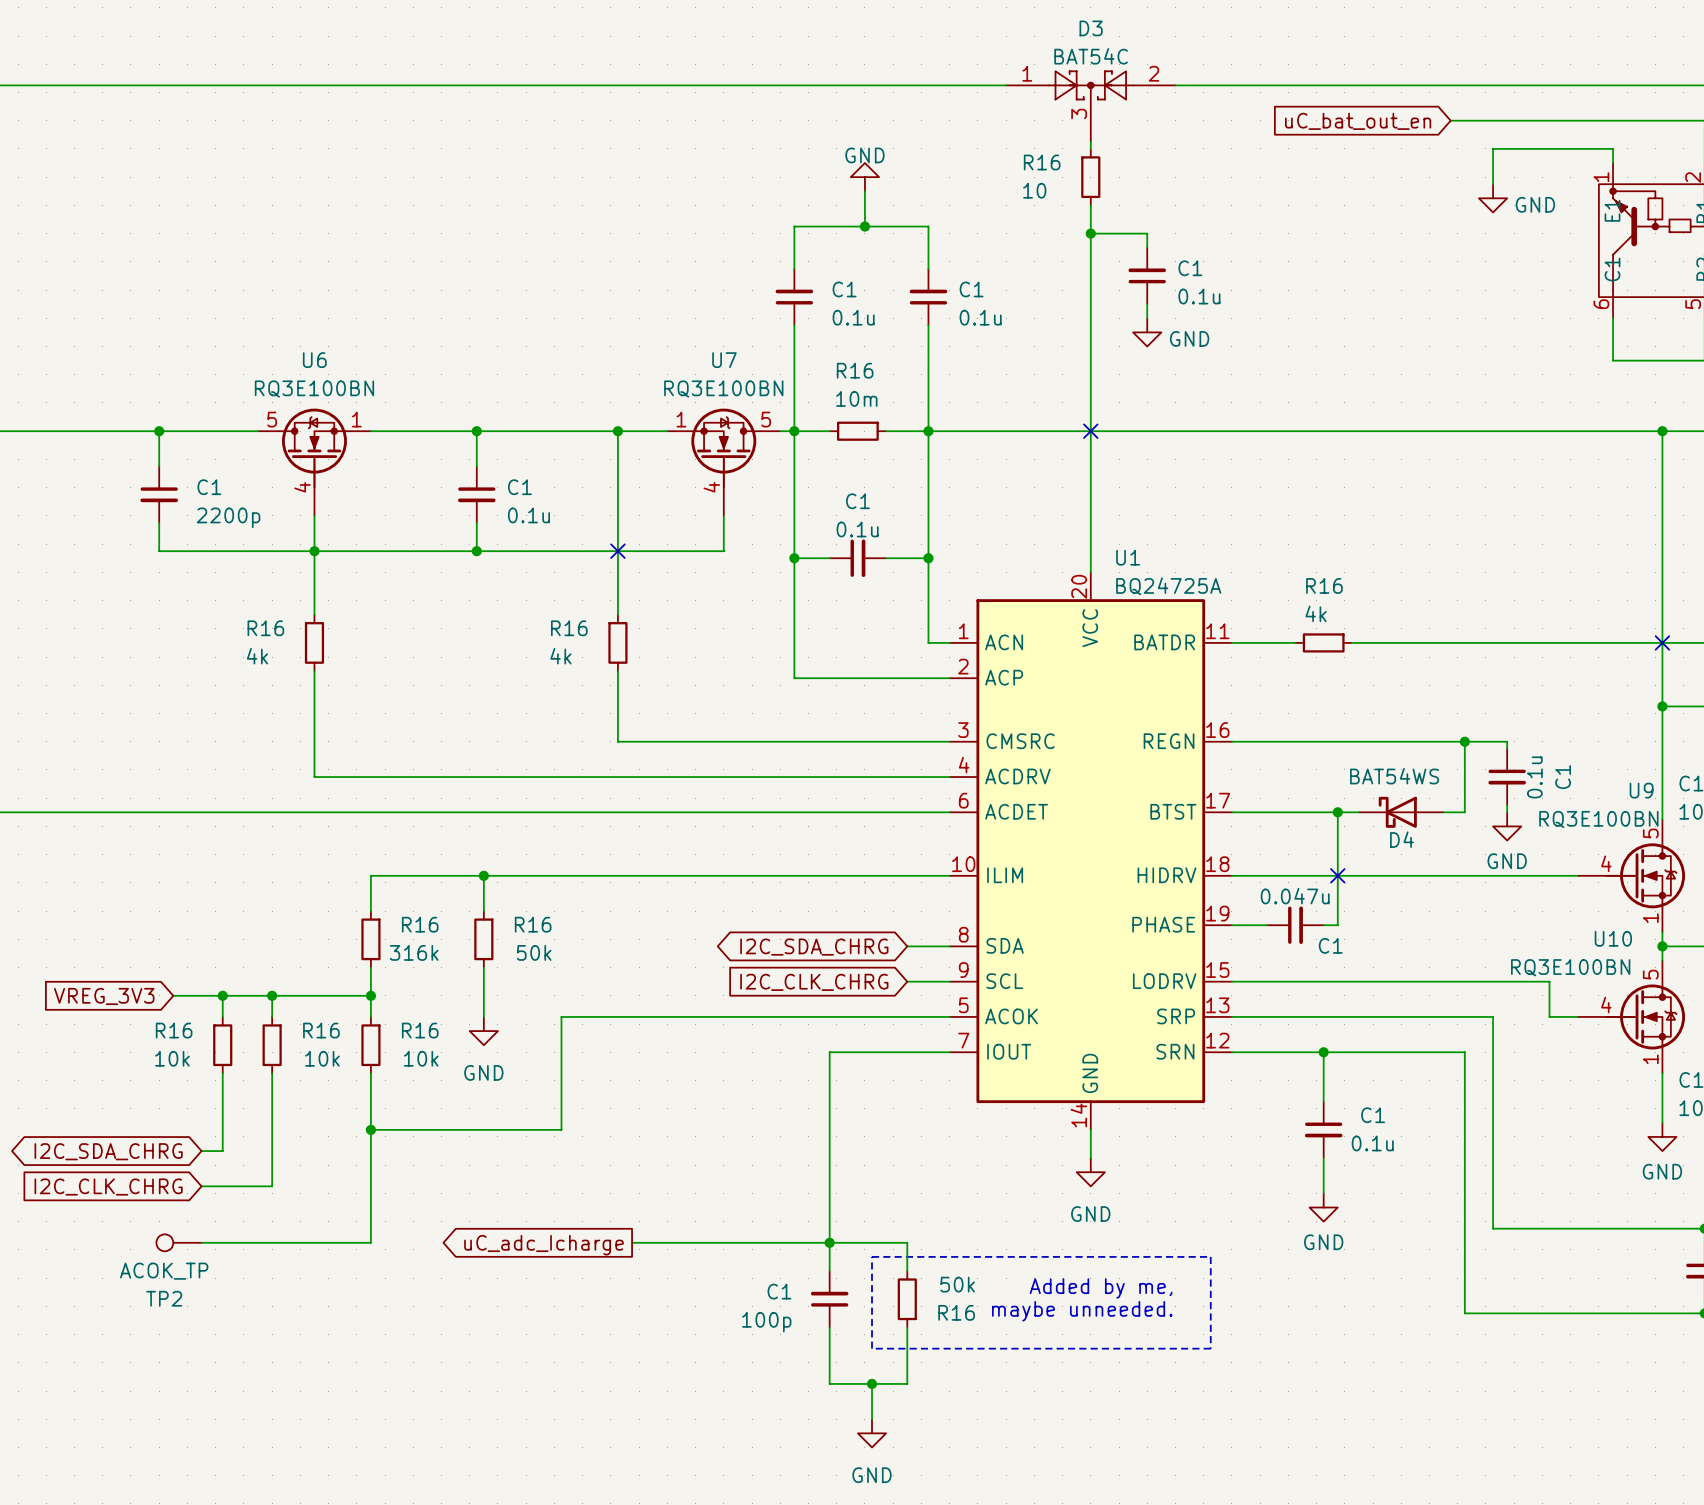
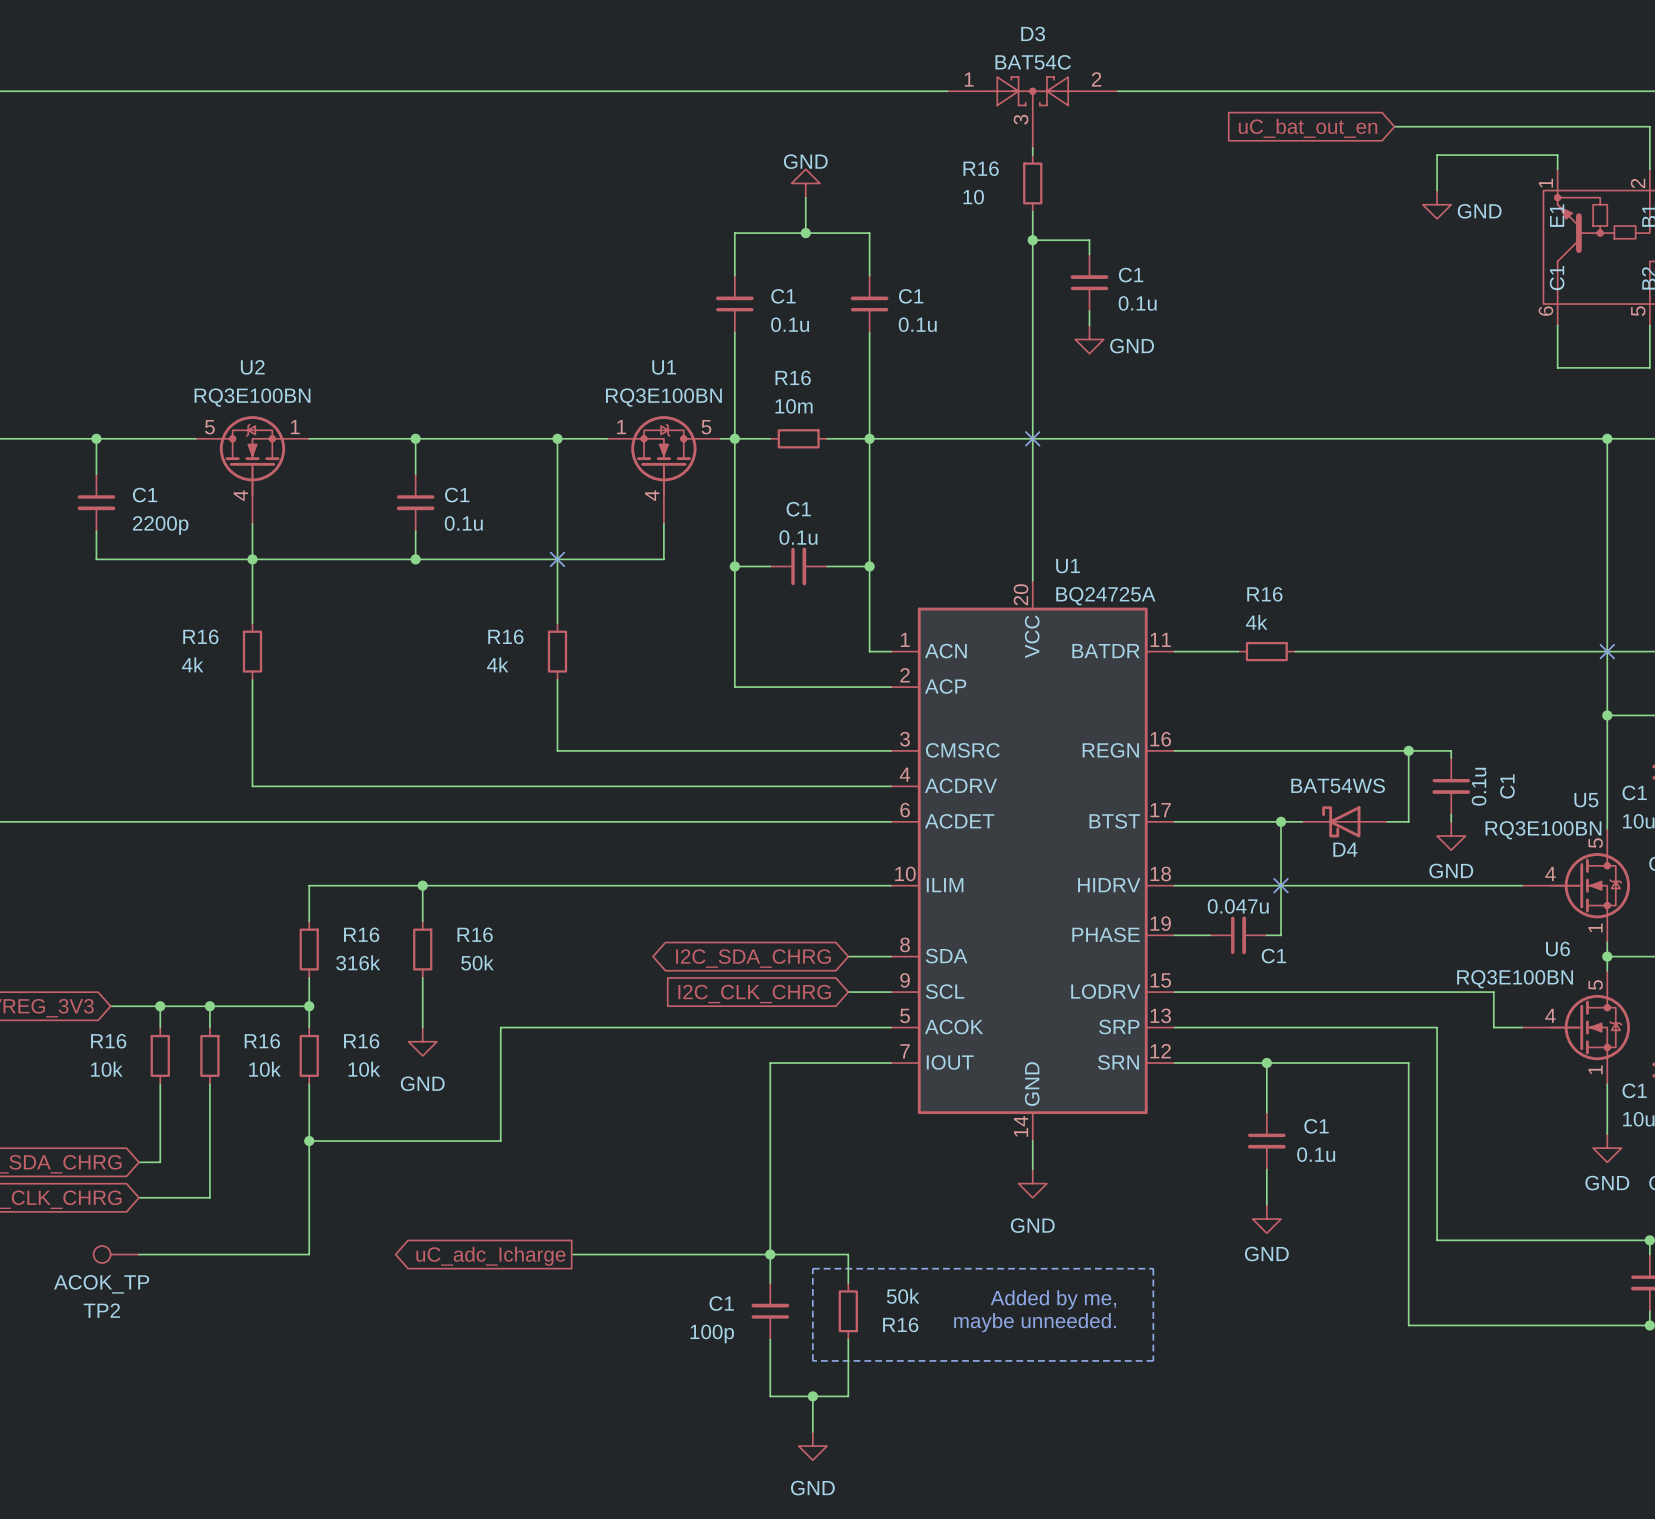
U6 name: U6 (314, 360) -> U2 (252, 367)
U7 name: U7 (724, 360) -> U1 (664, 367)
U9 name: U9 (1641, 790) -> U5 (1586, 800)
U10 name: U10 (1613, 938) -> U6 (1557, 948)

